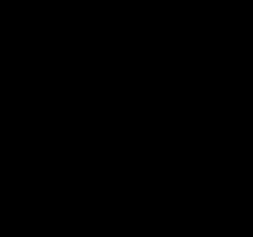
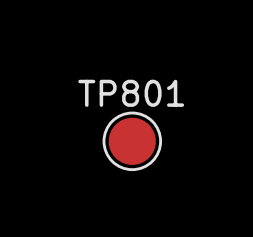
TP801: none -> (132, 141)

